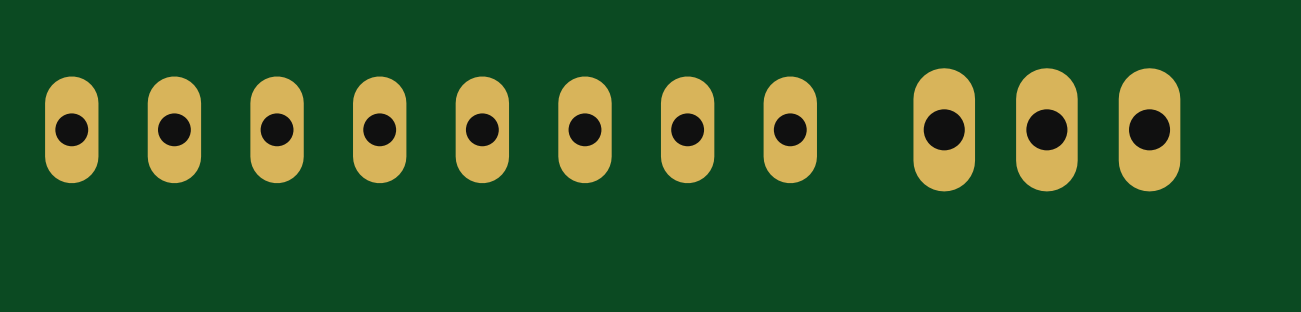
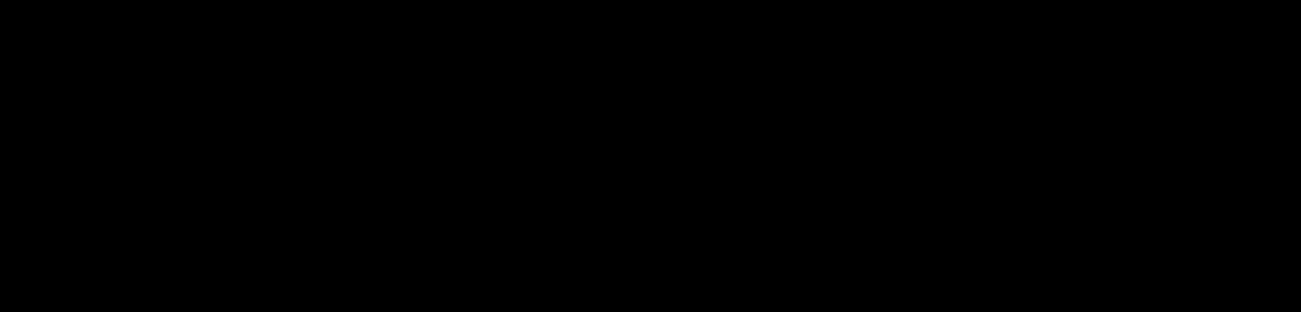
part: (431, 129) -> none
part: (1046, 129) -> none

